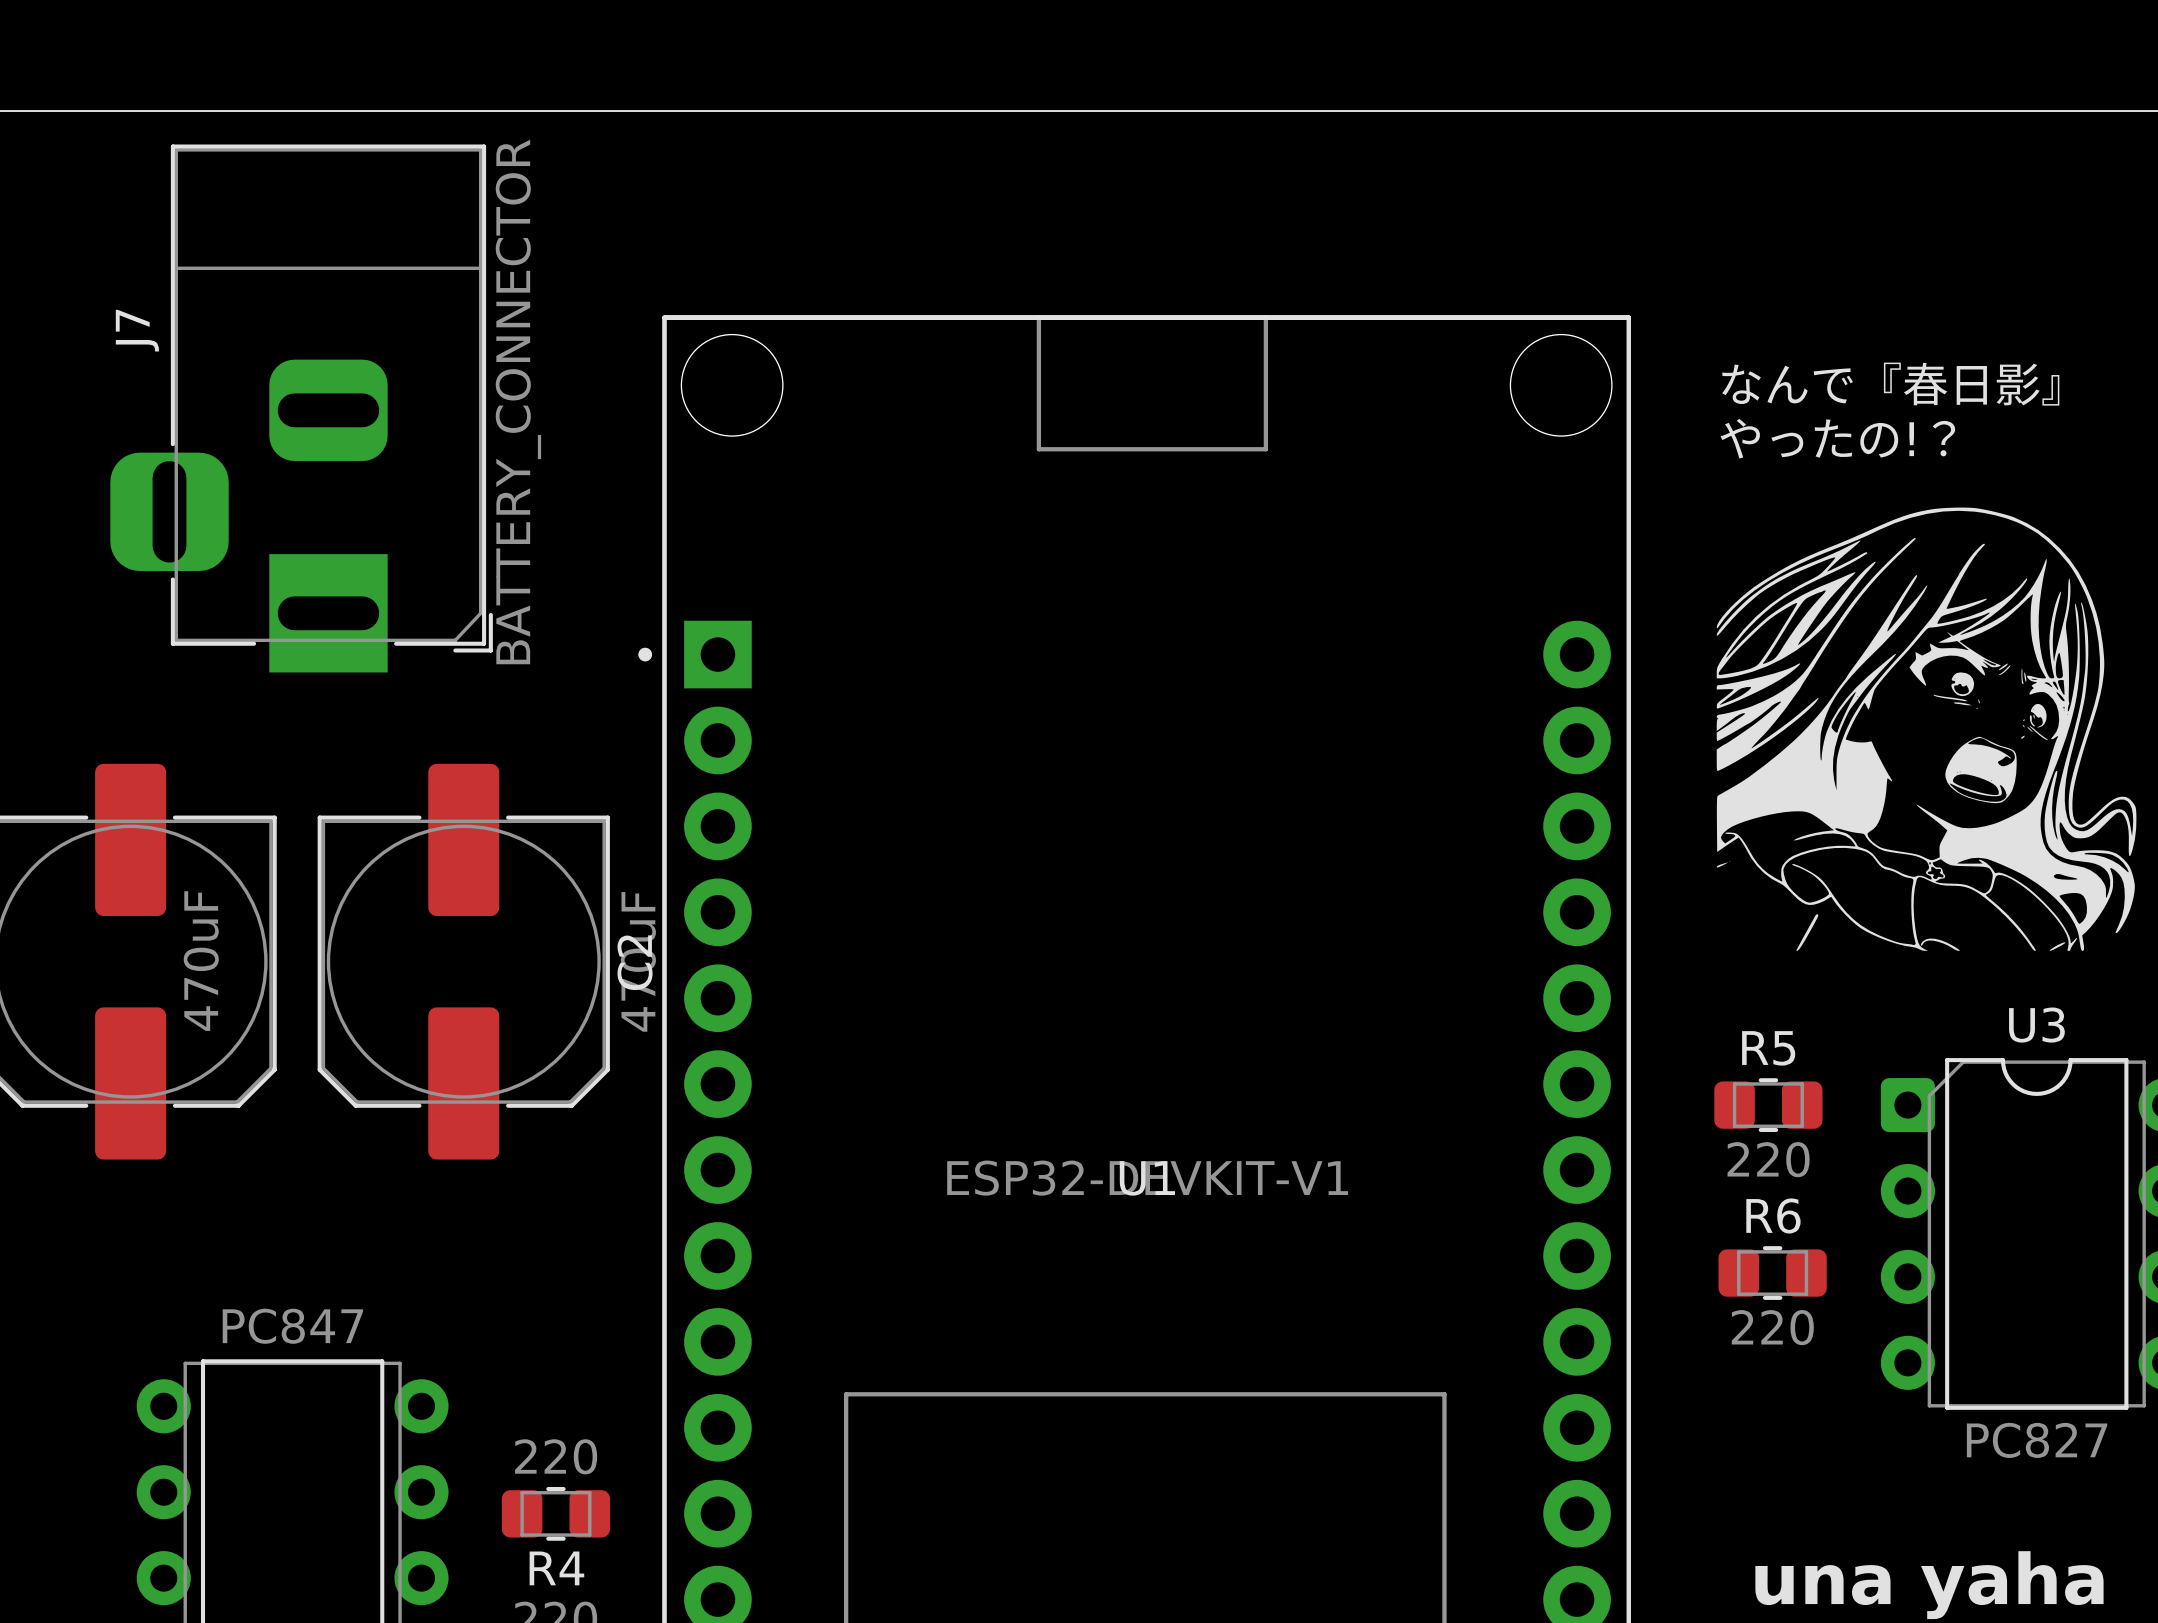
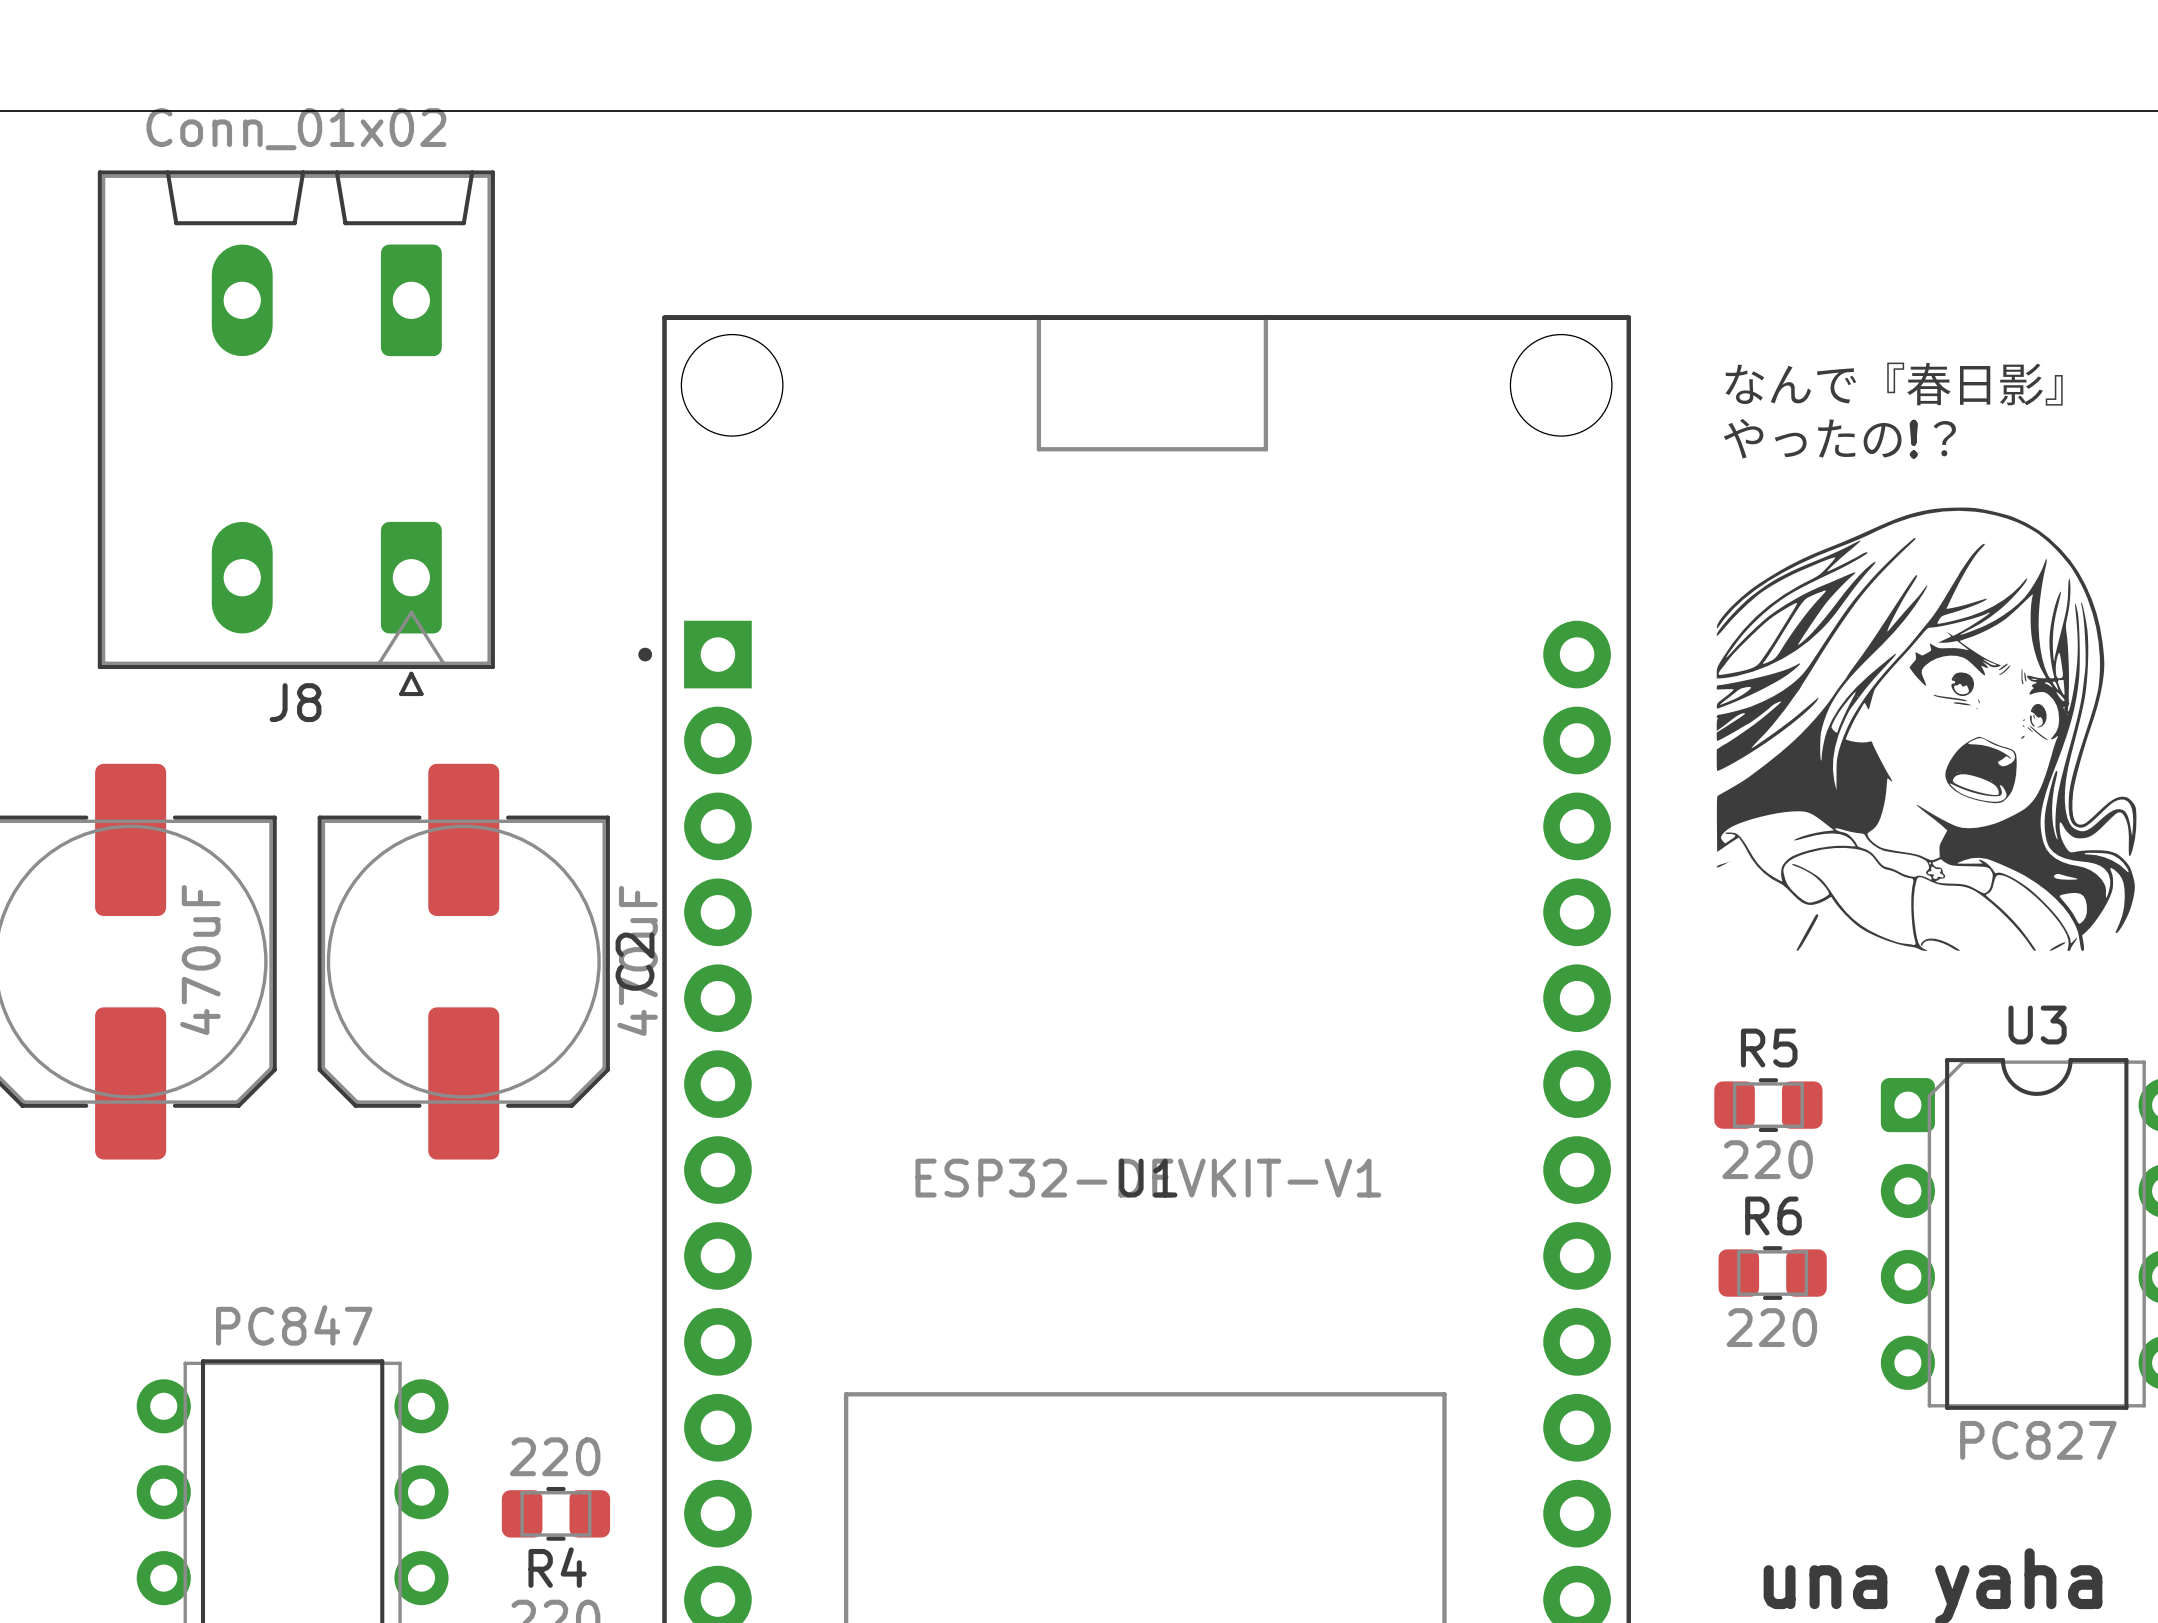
J7: BATTERY_CONNECTOR (301, 408) -> none
J8: none -> Conn_01x02 (296, 433)

